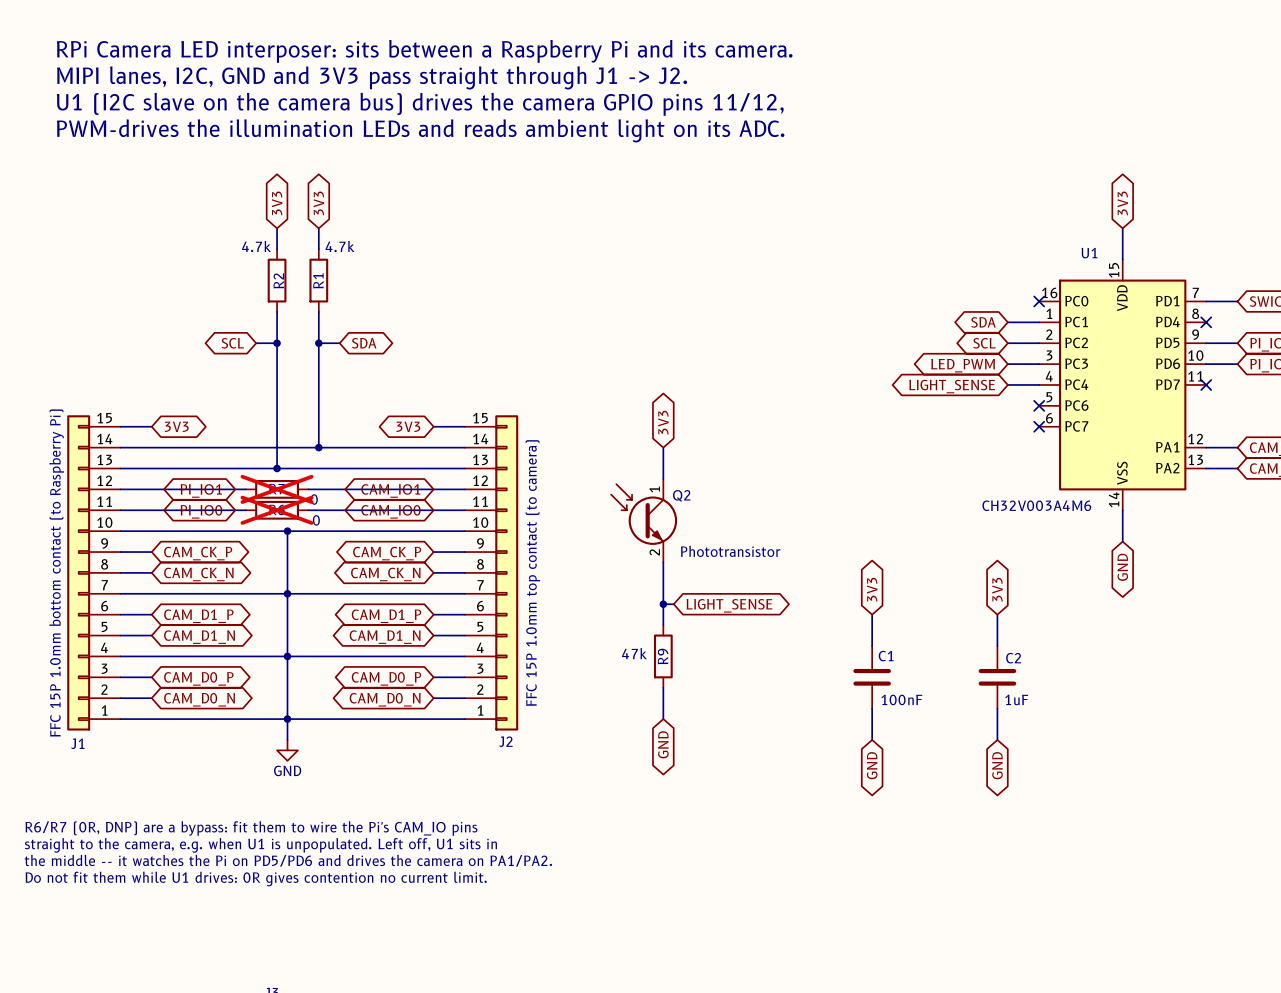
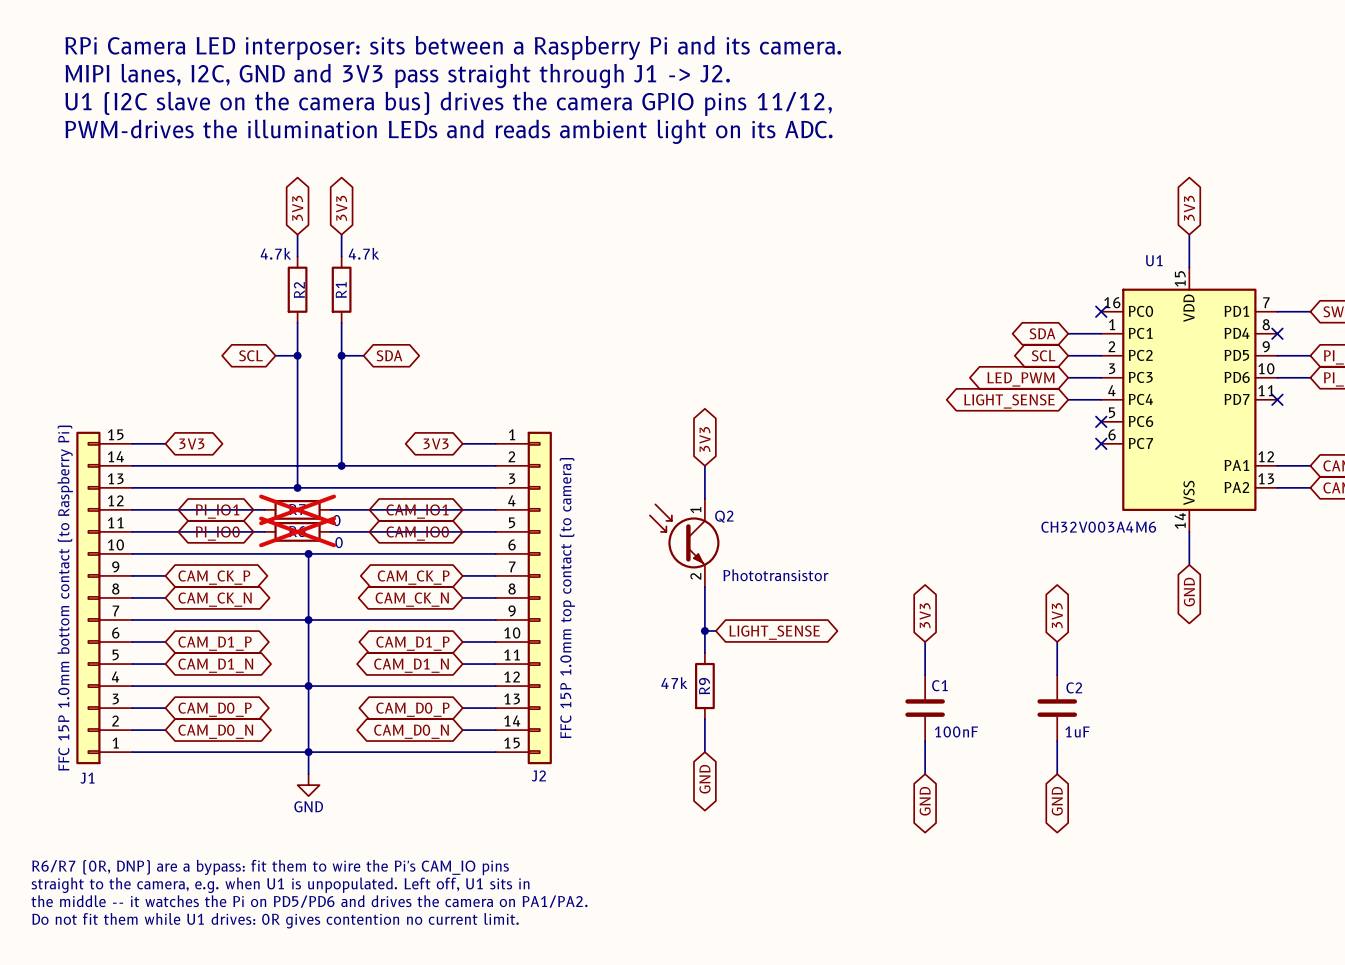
J2 flip: as is (506, 572) -> up-down (539, 597)

